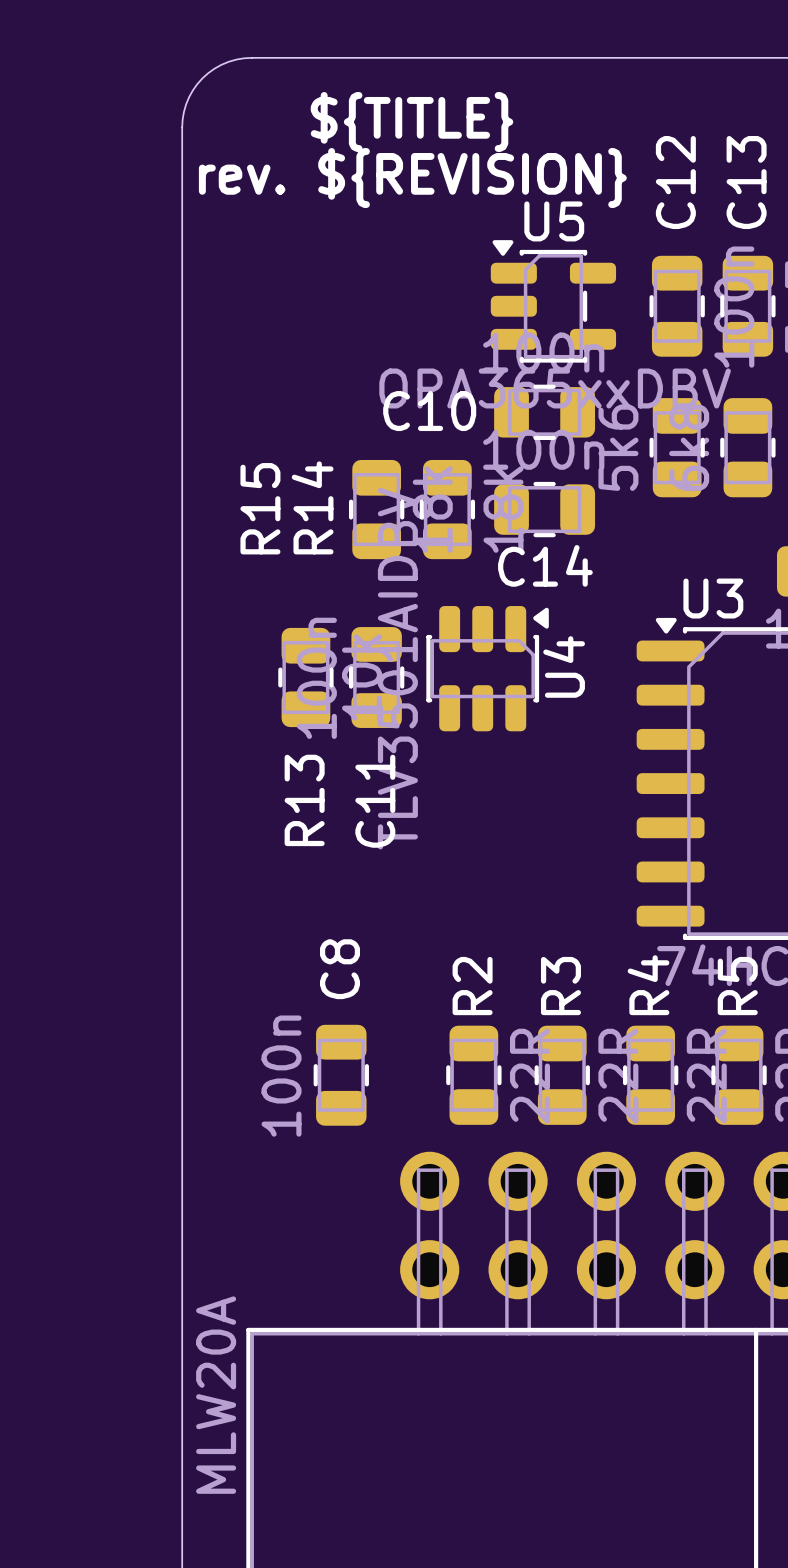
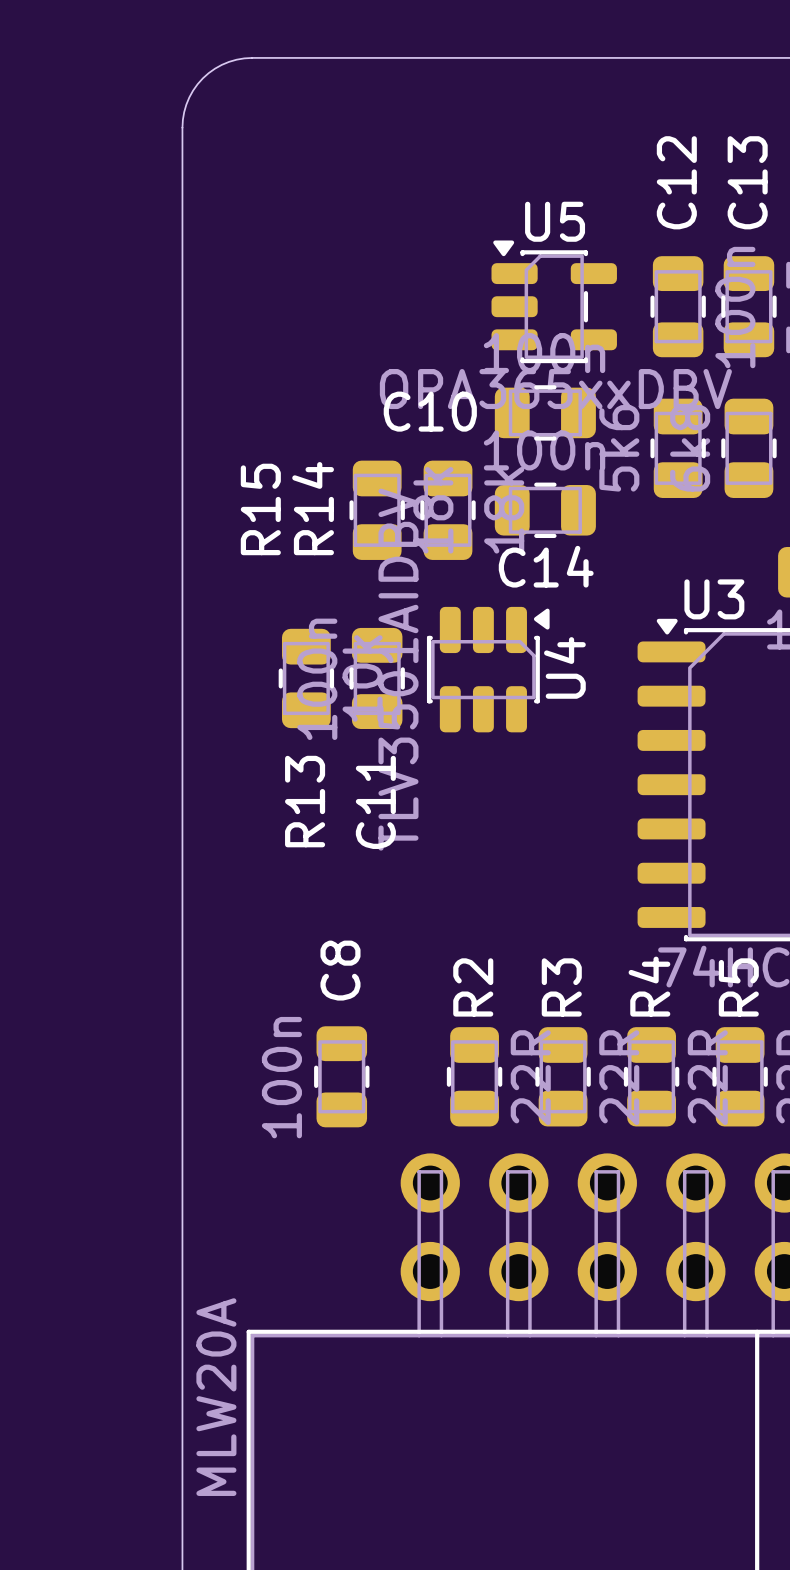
text: ${TITLE} (412, 121) -> none
text: rev. ${REVISION} (412, 178) -> none

